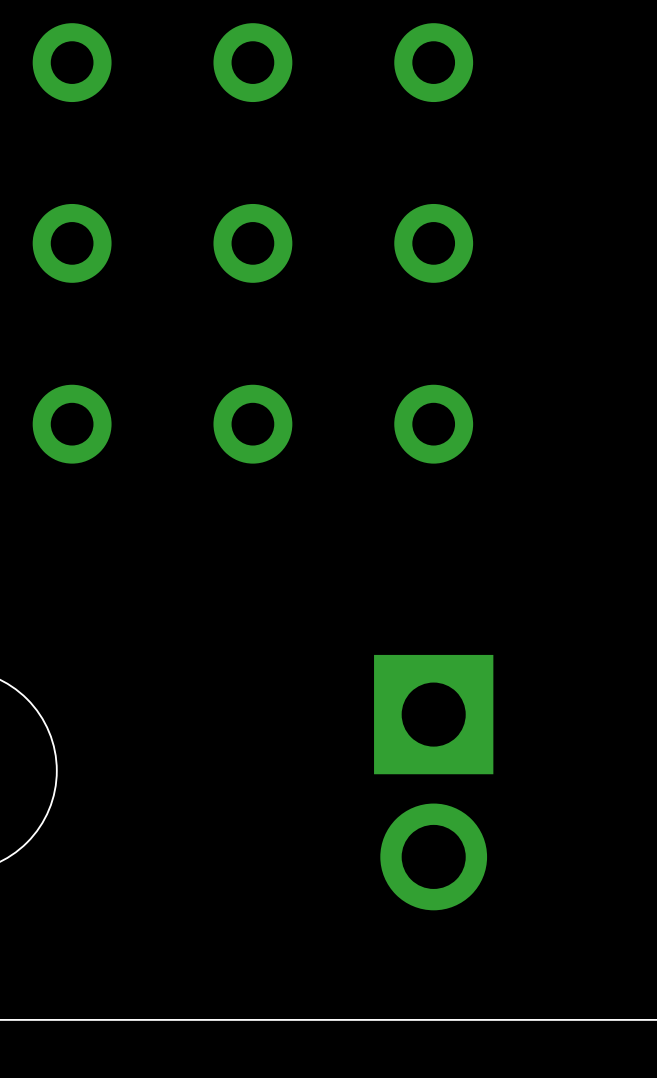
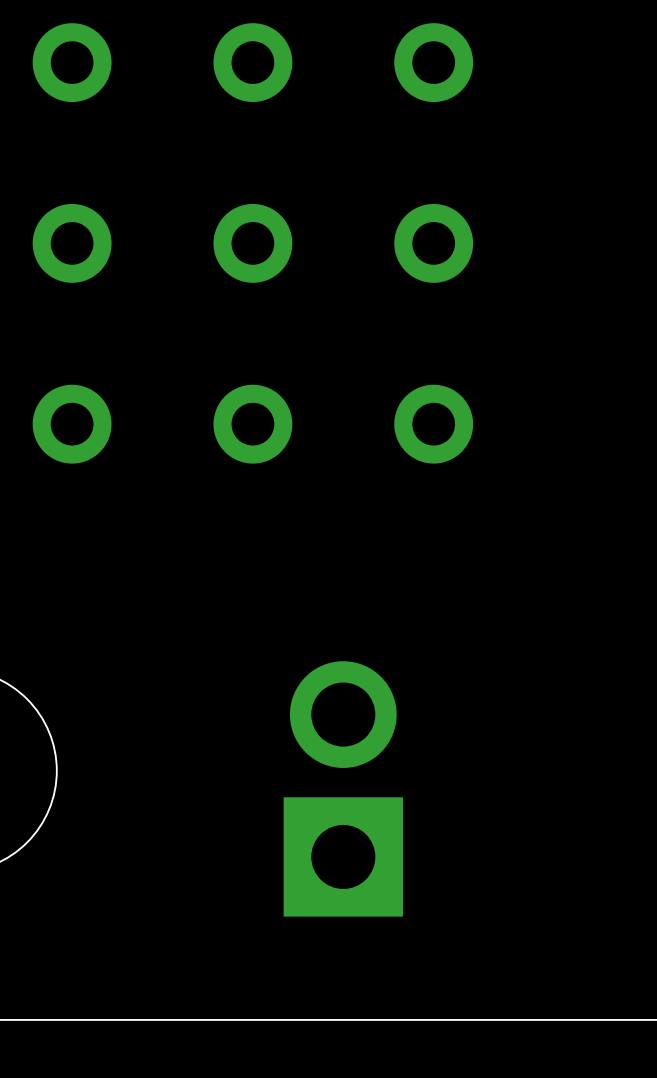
part rotation: 0° (433, 782) -> 180° (343, 788)

